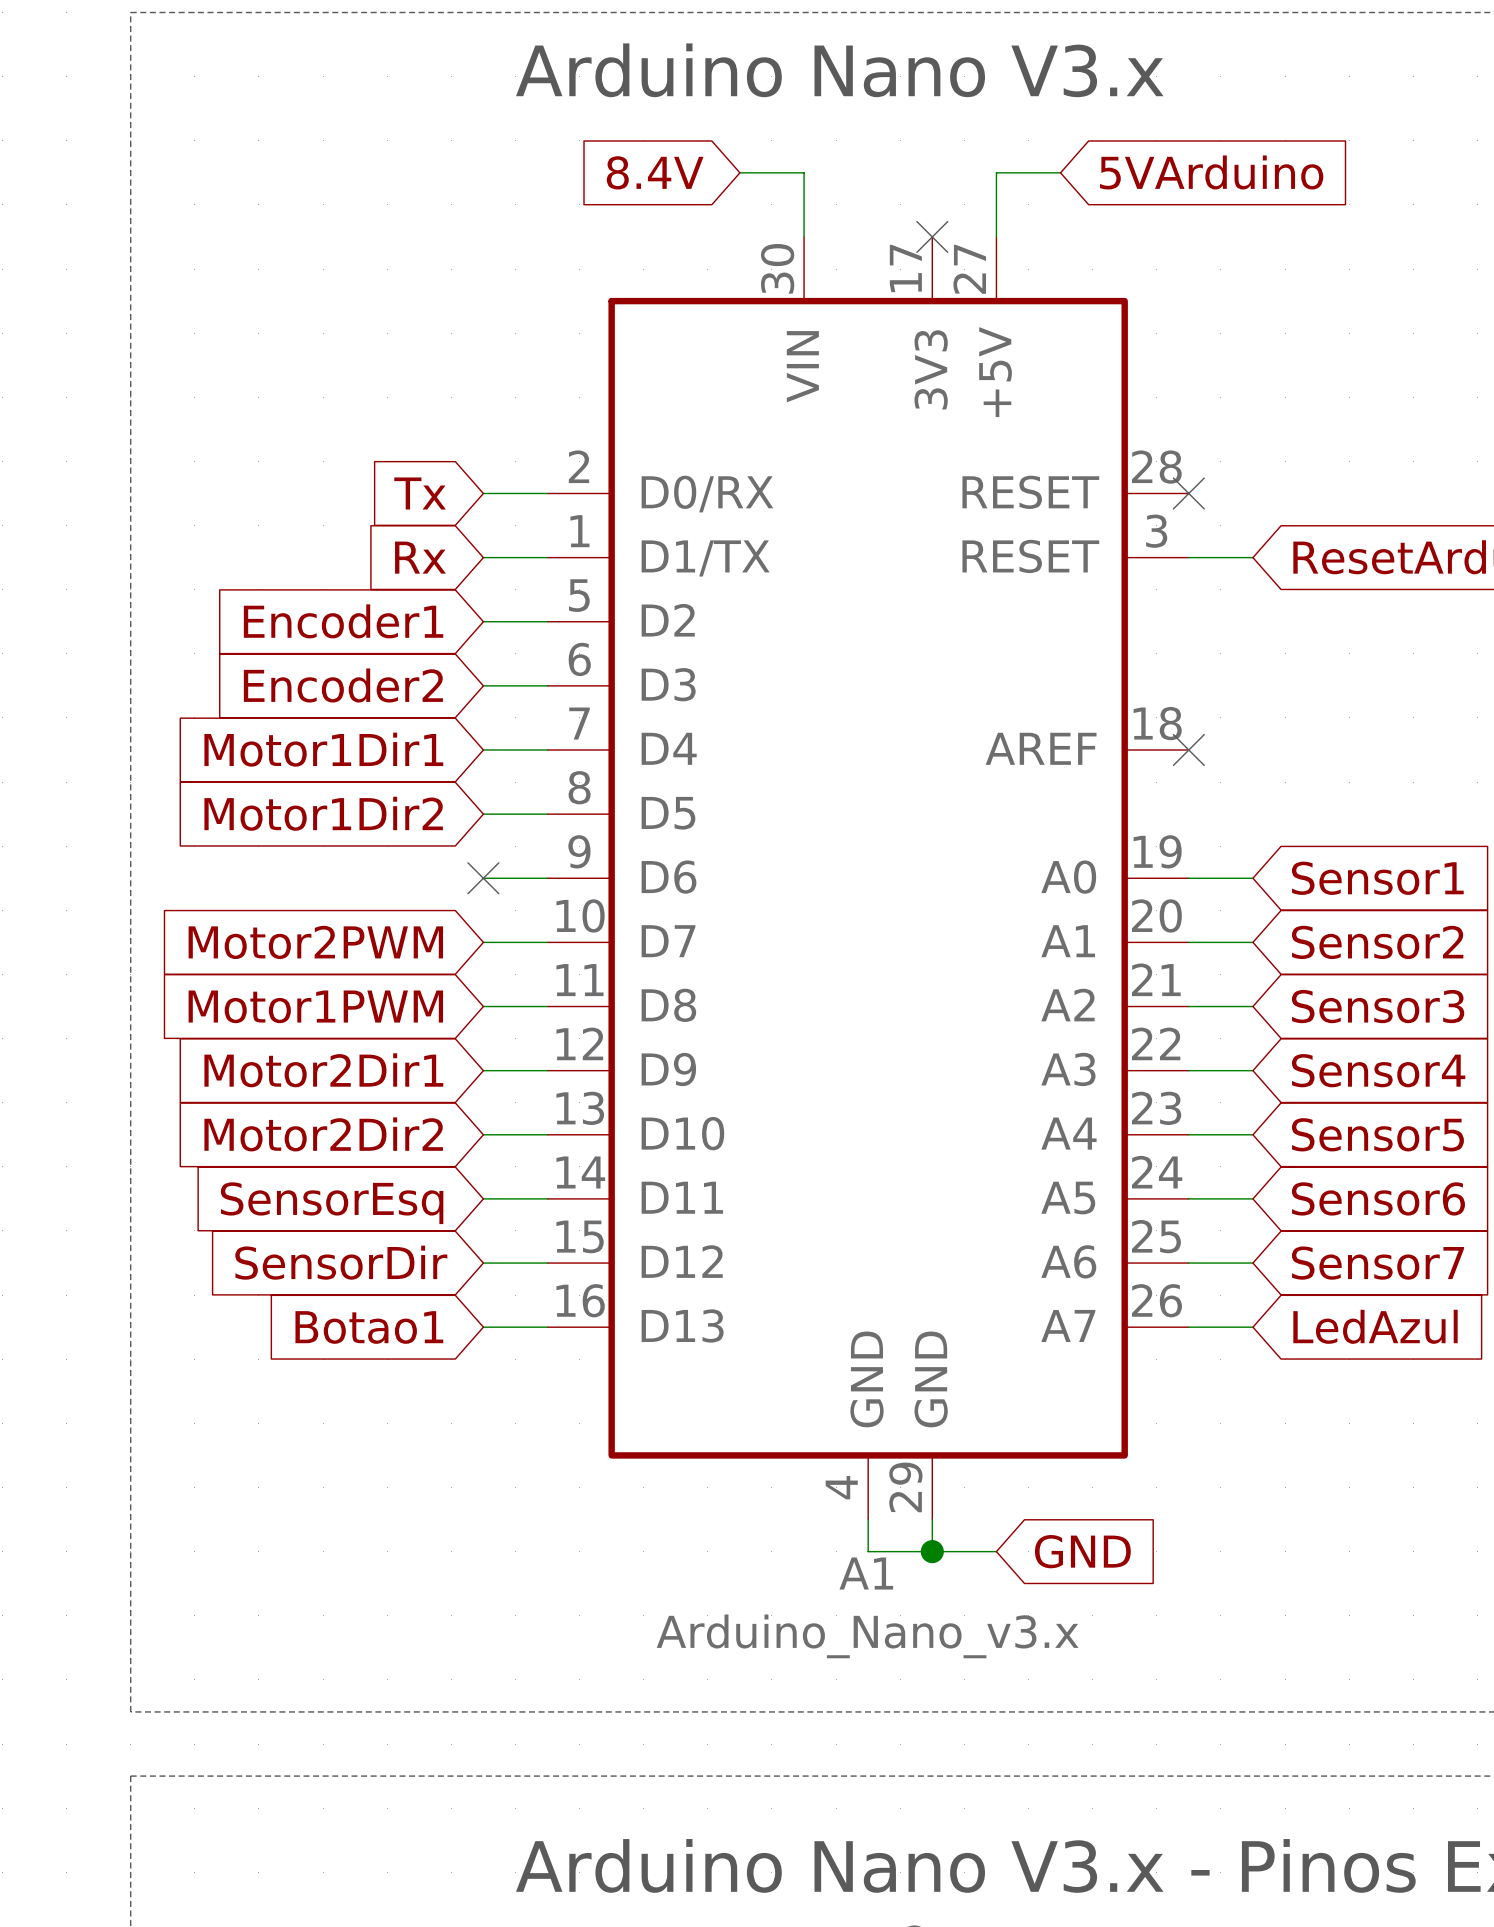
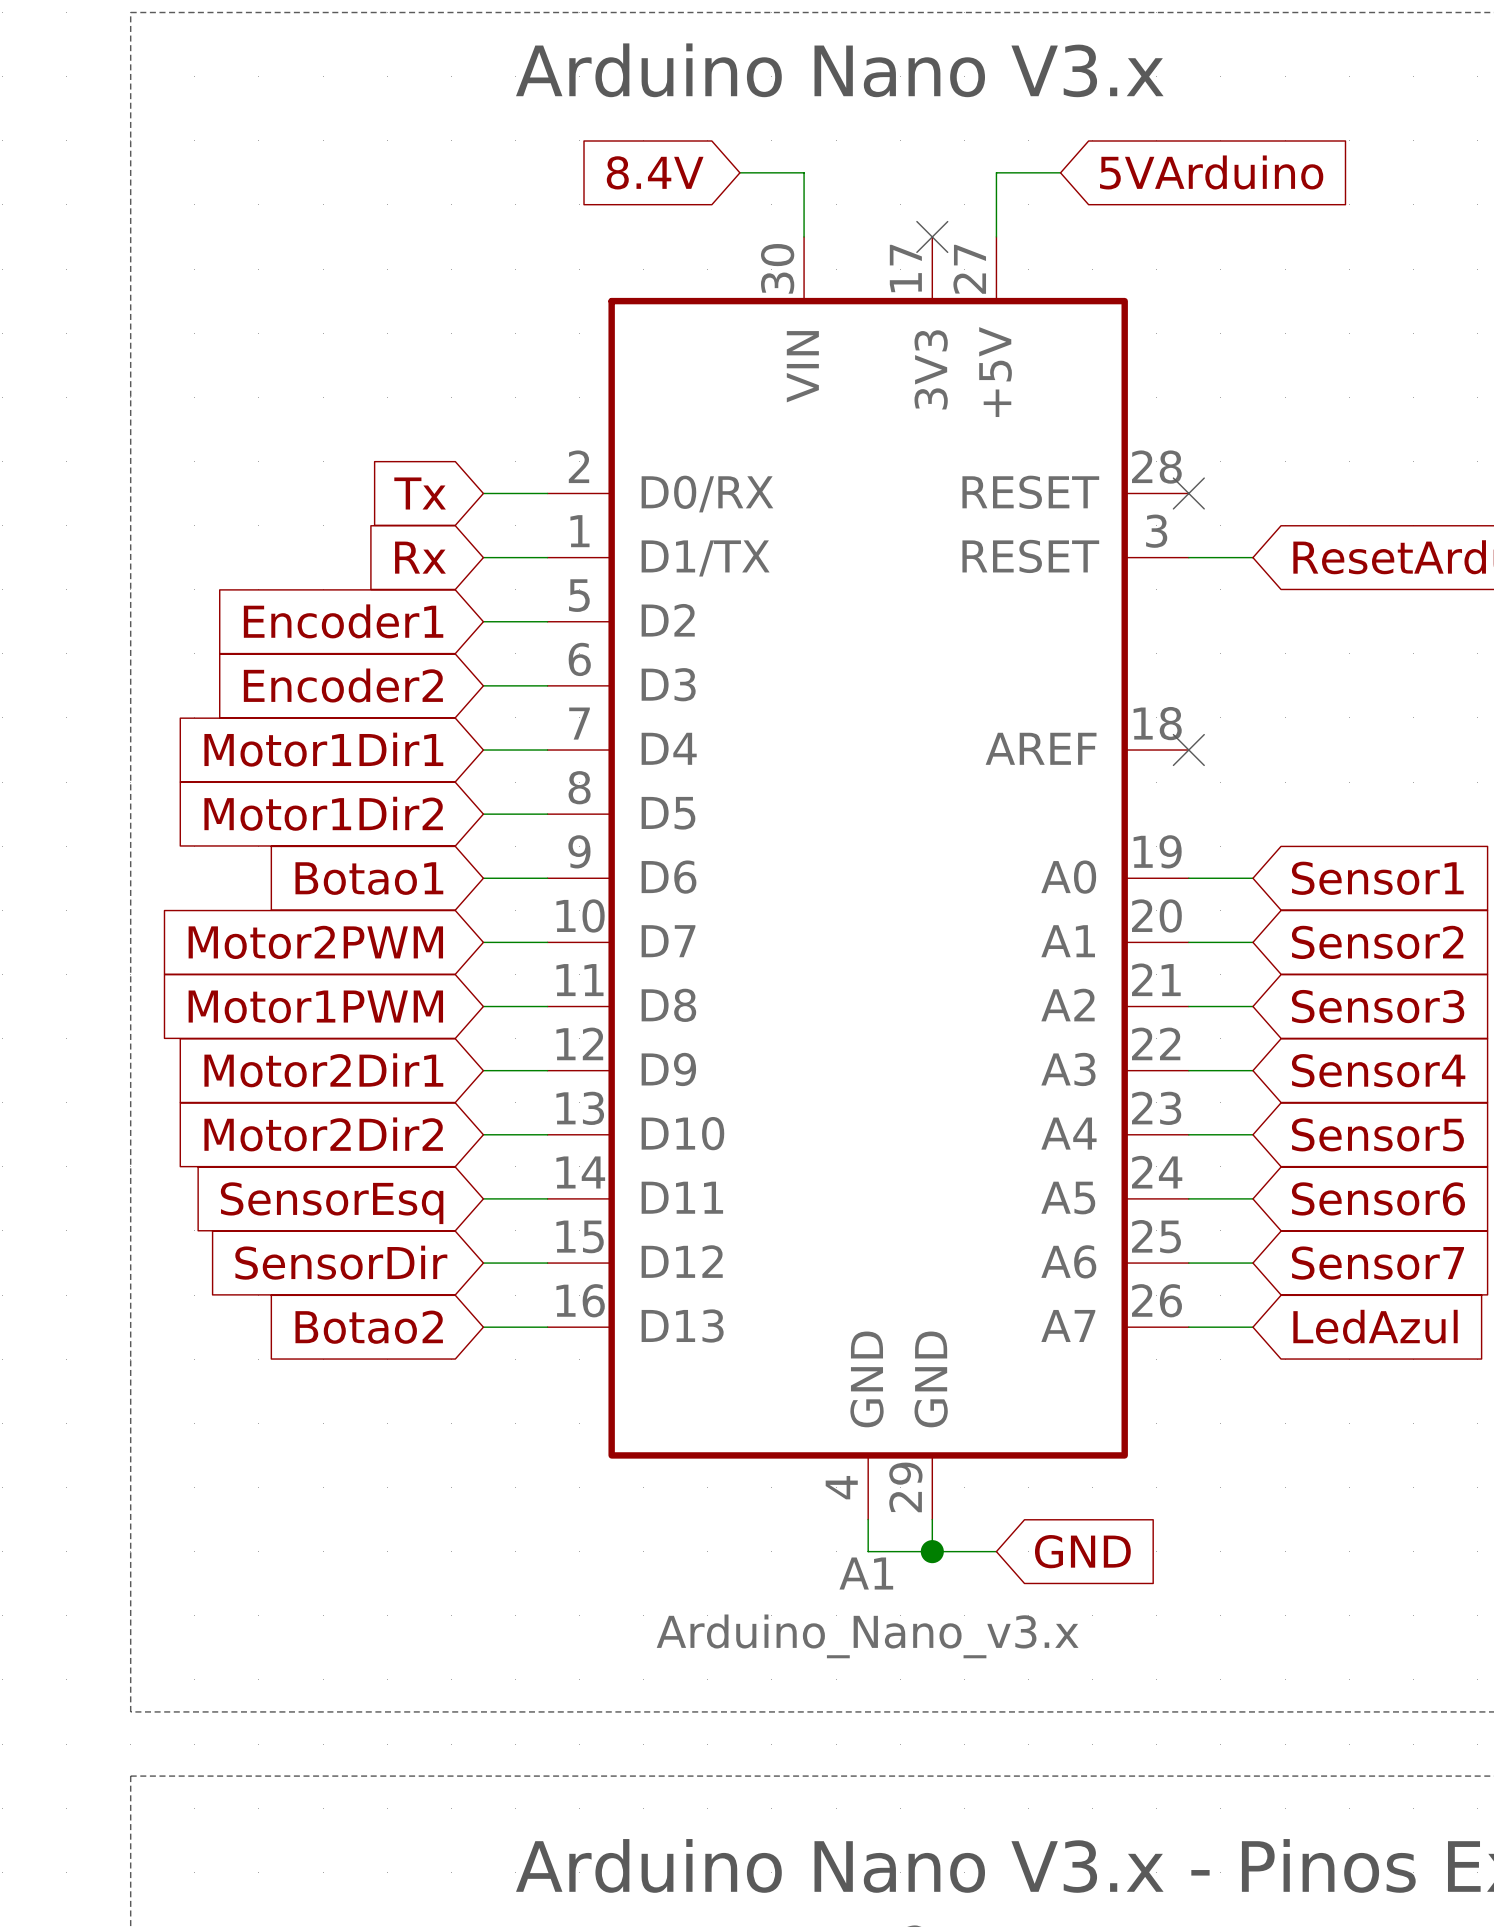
global label: none -> Botao1 (369, 878)
no-connect mark: (483, 878) -> none
global label: Botao1 (369, 1327) -> Botao2 (369, 1327)

